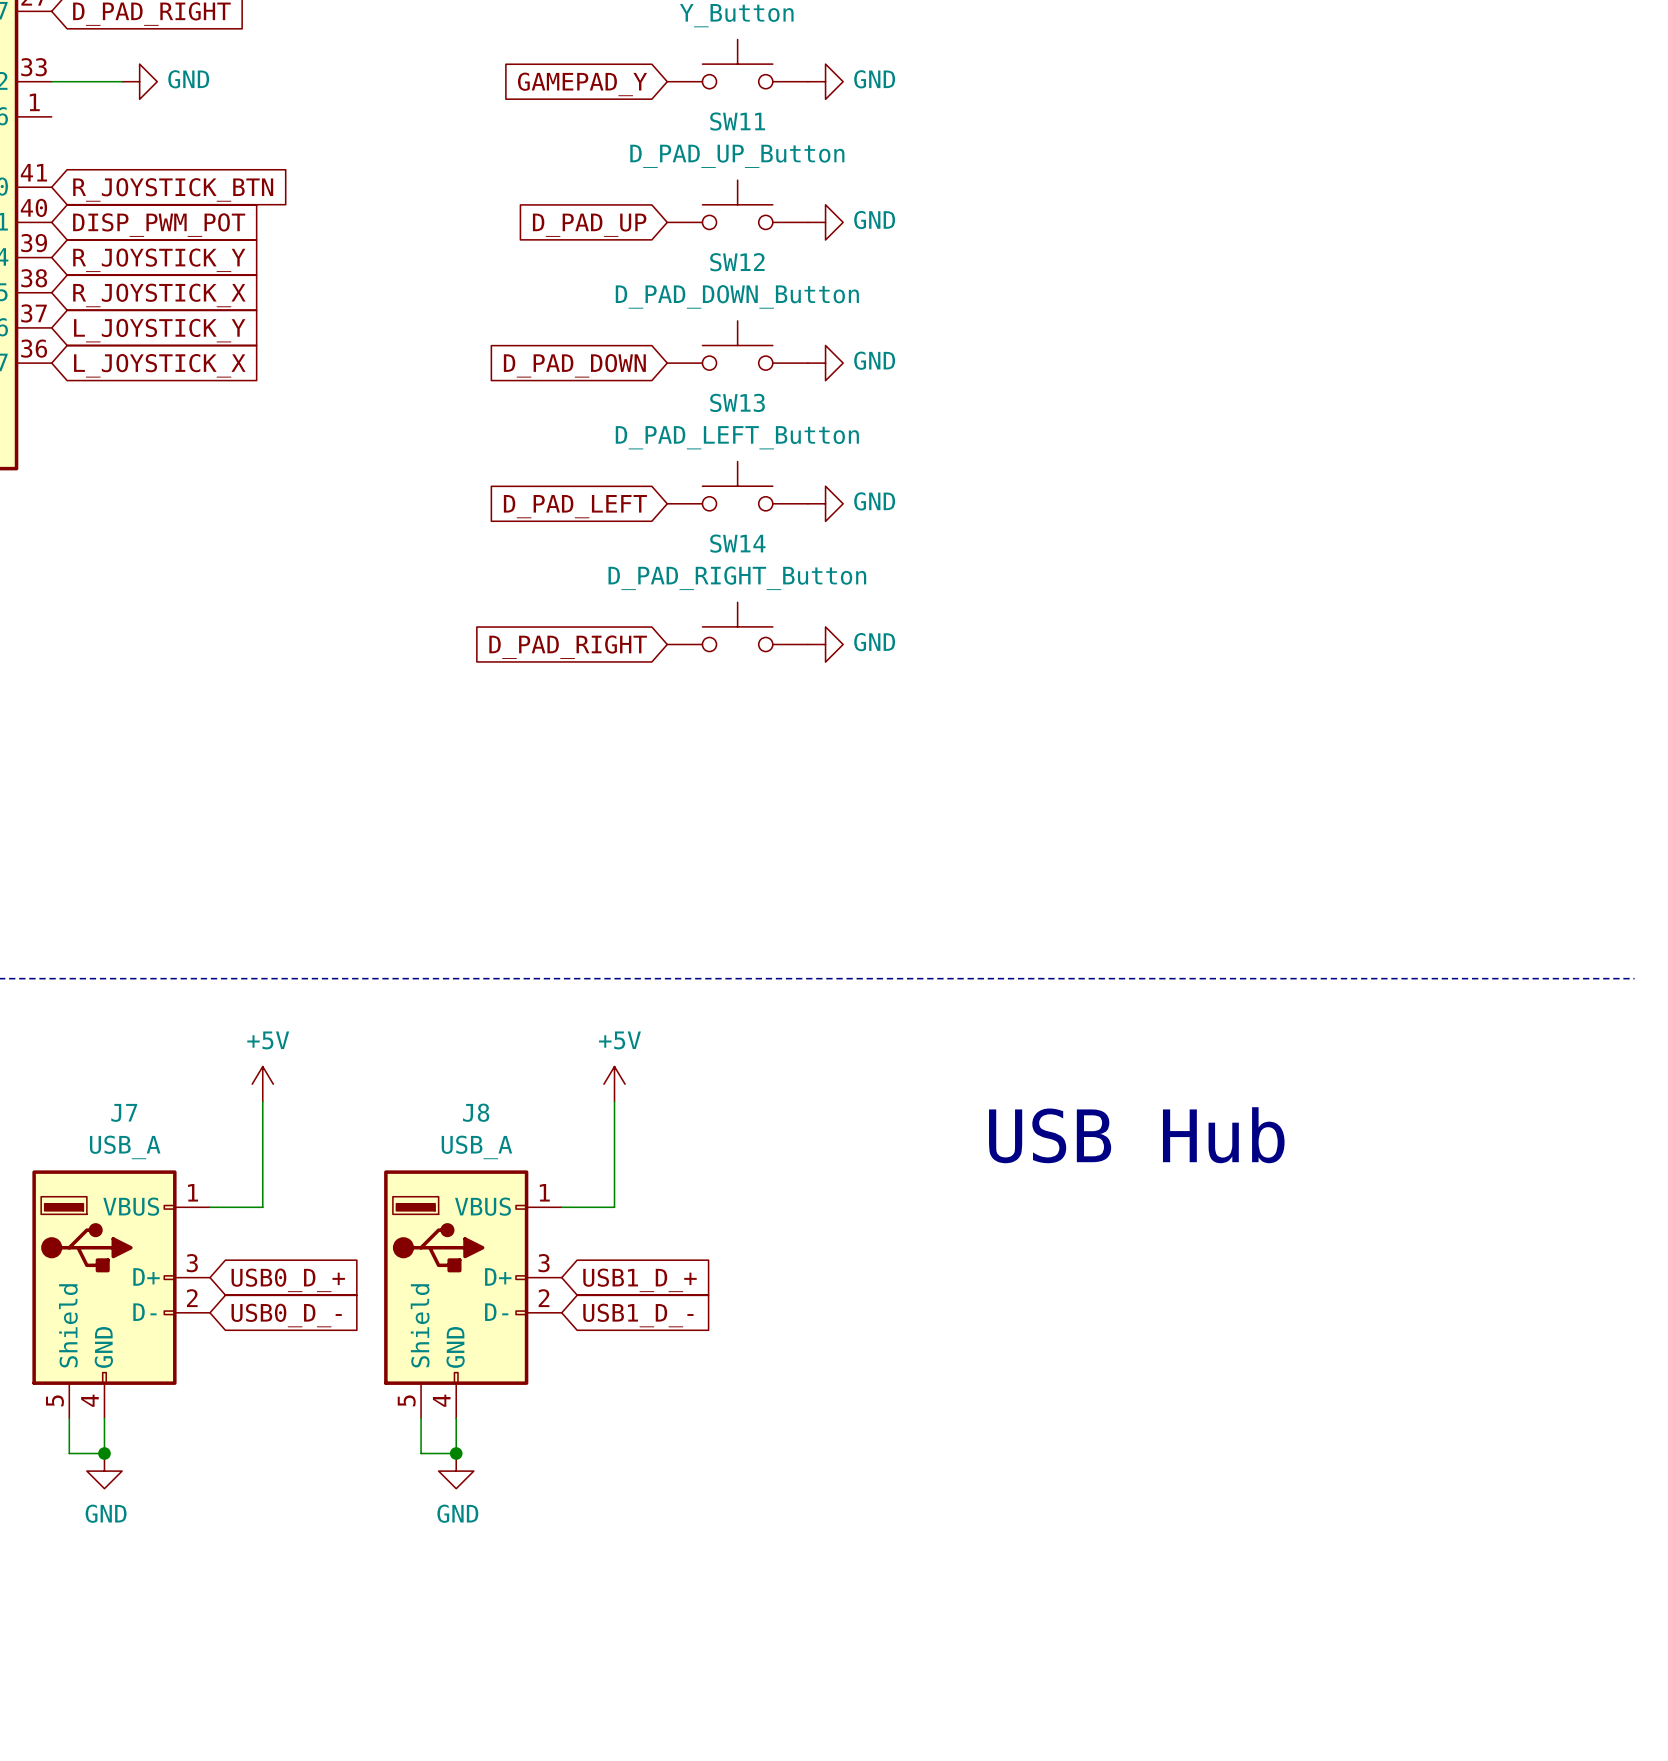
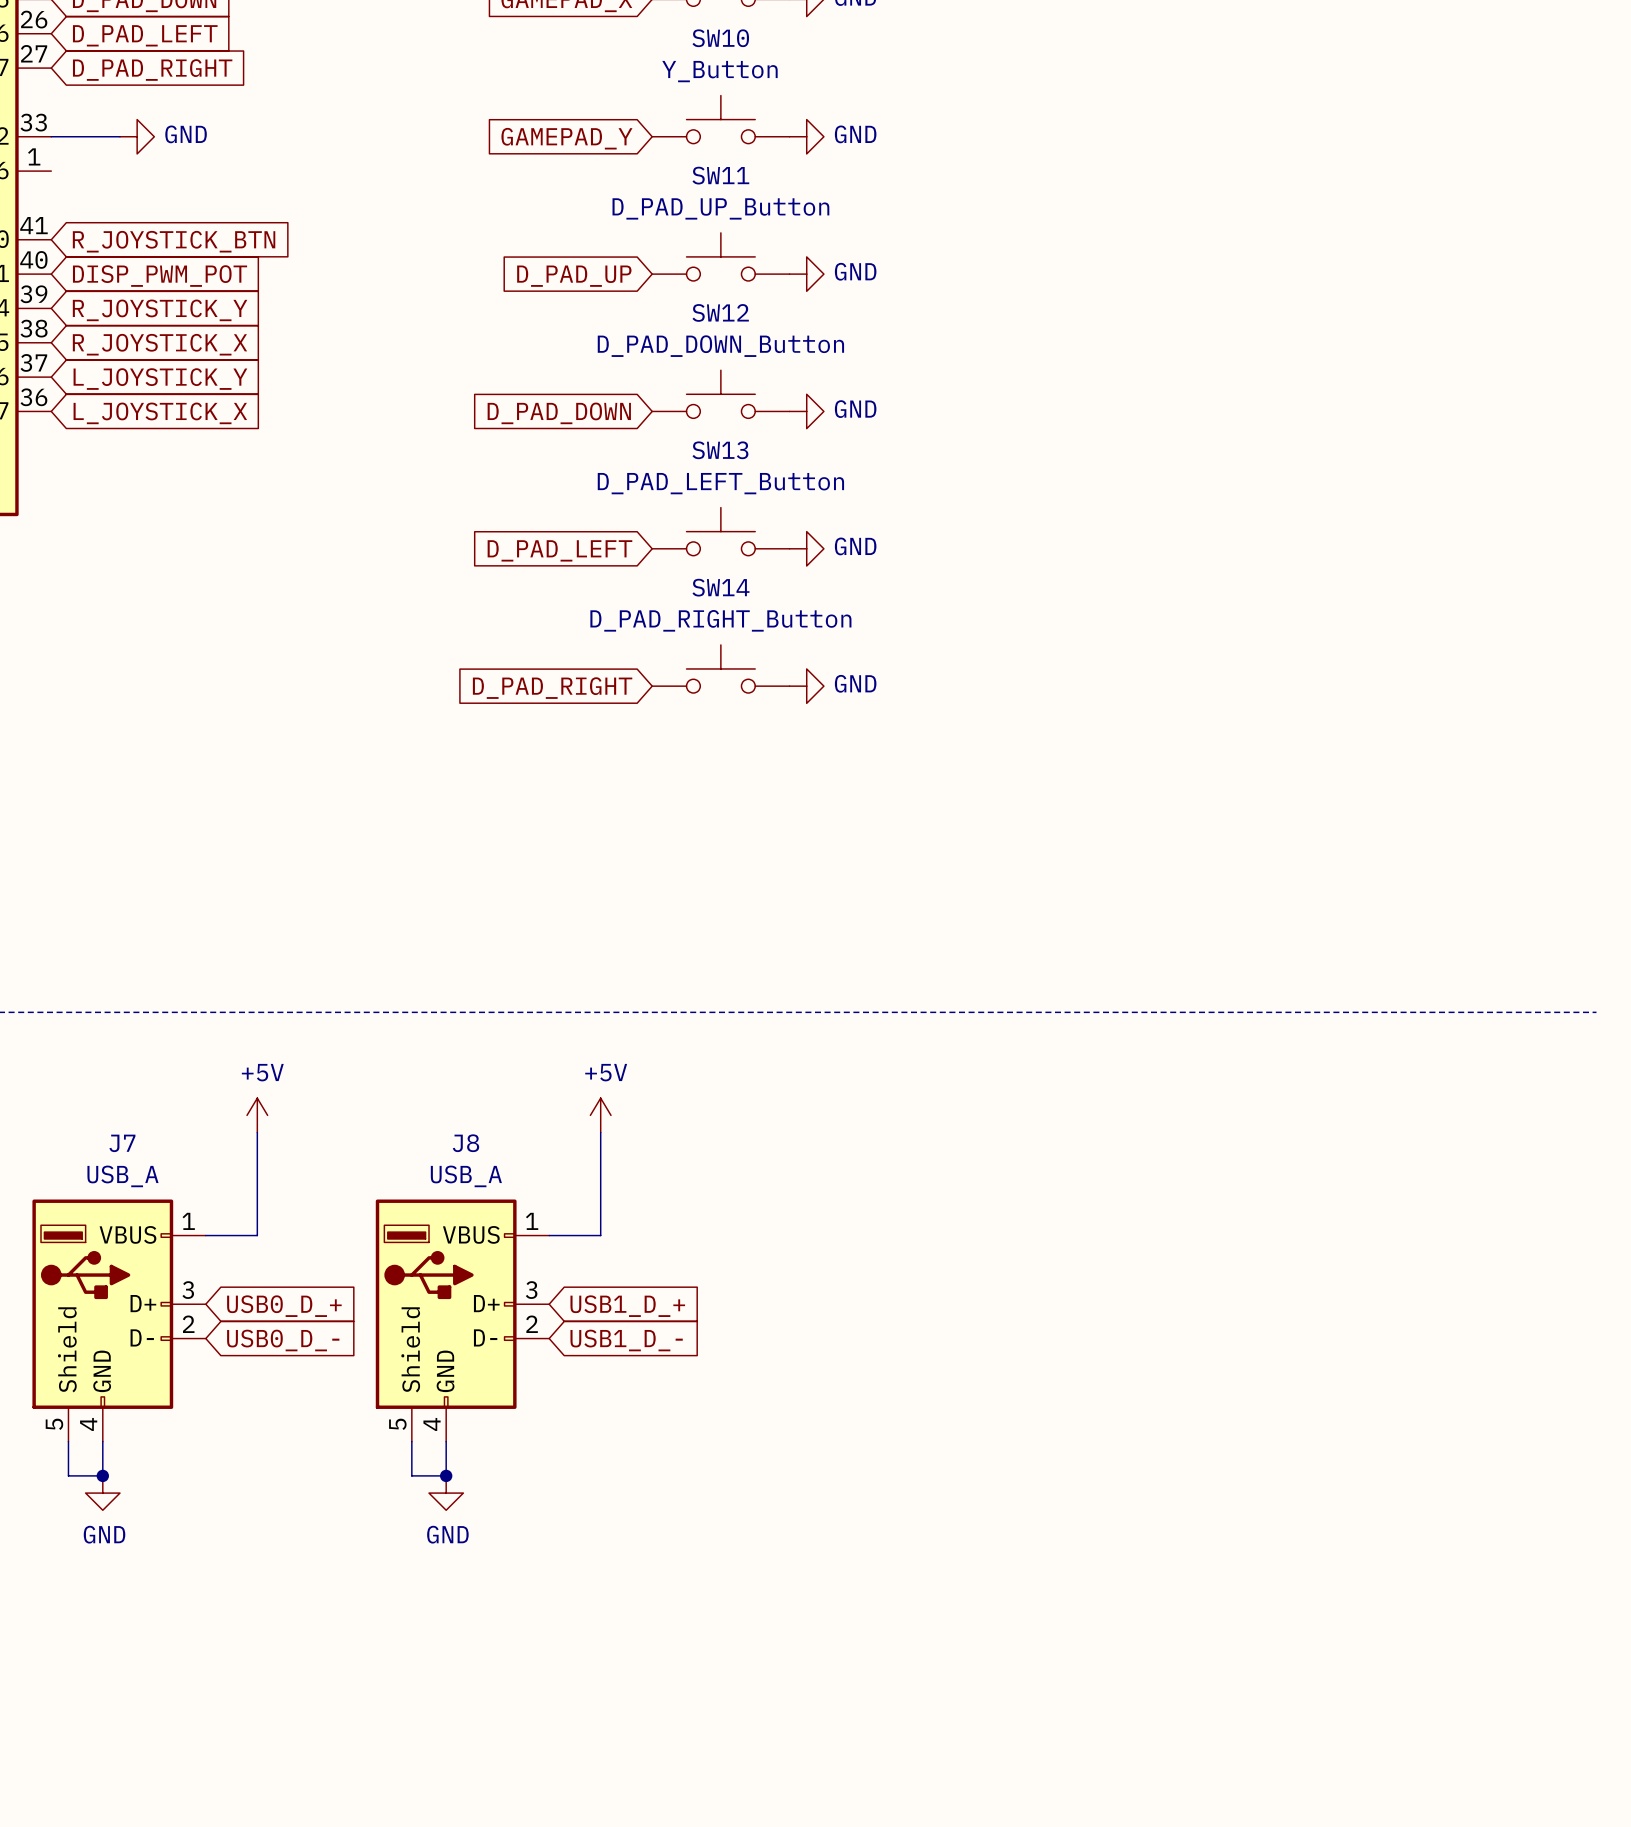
text: USB Hub (1136, 1135) -> none

